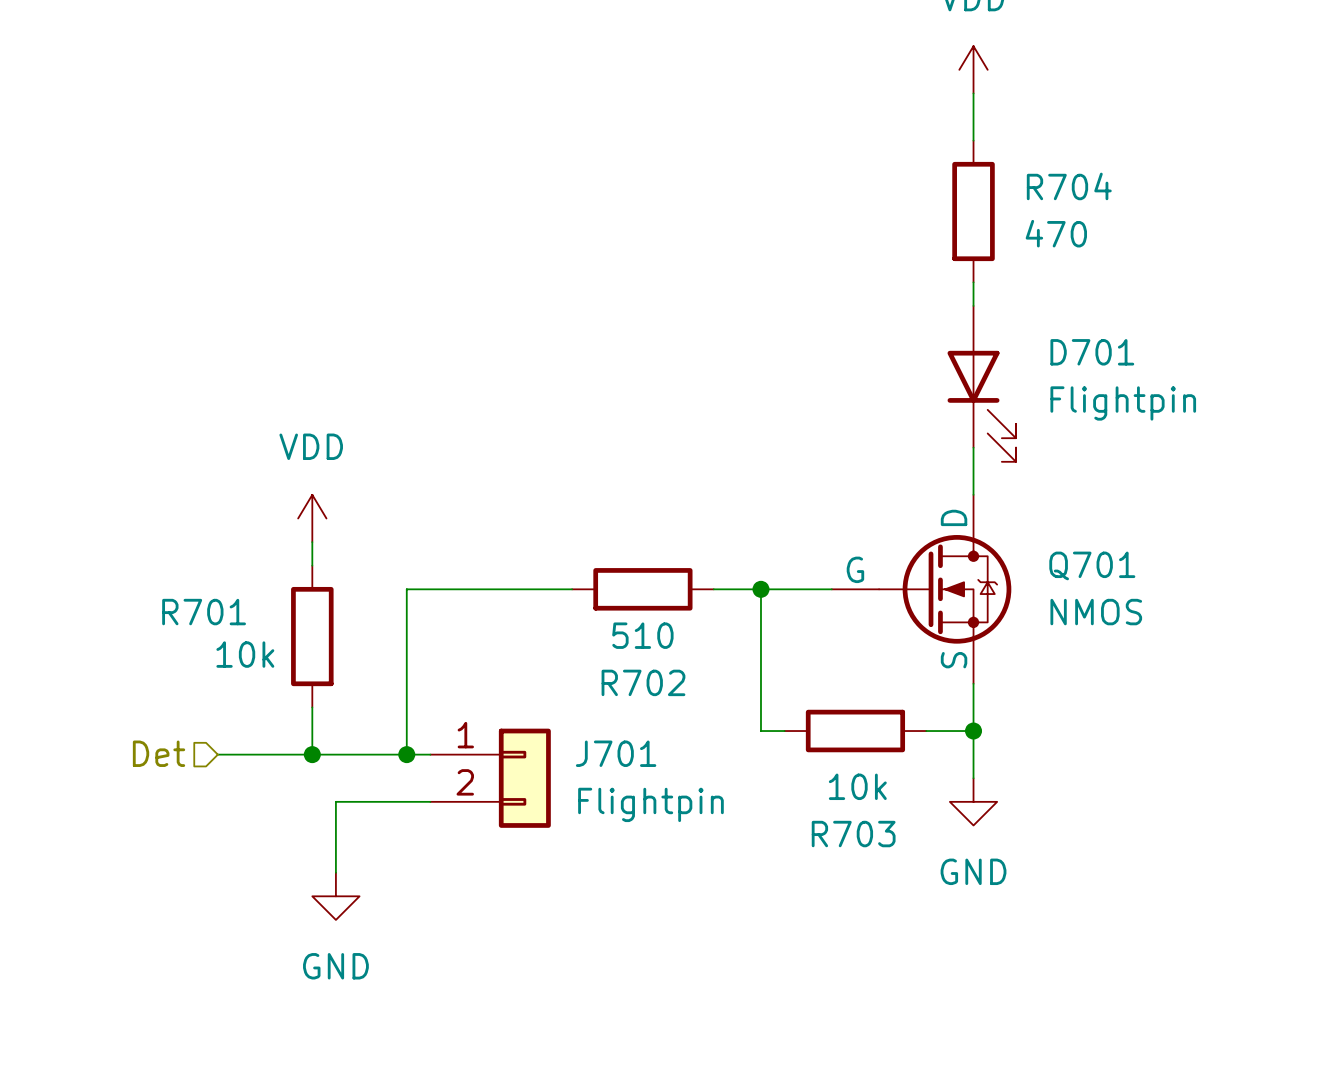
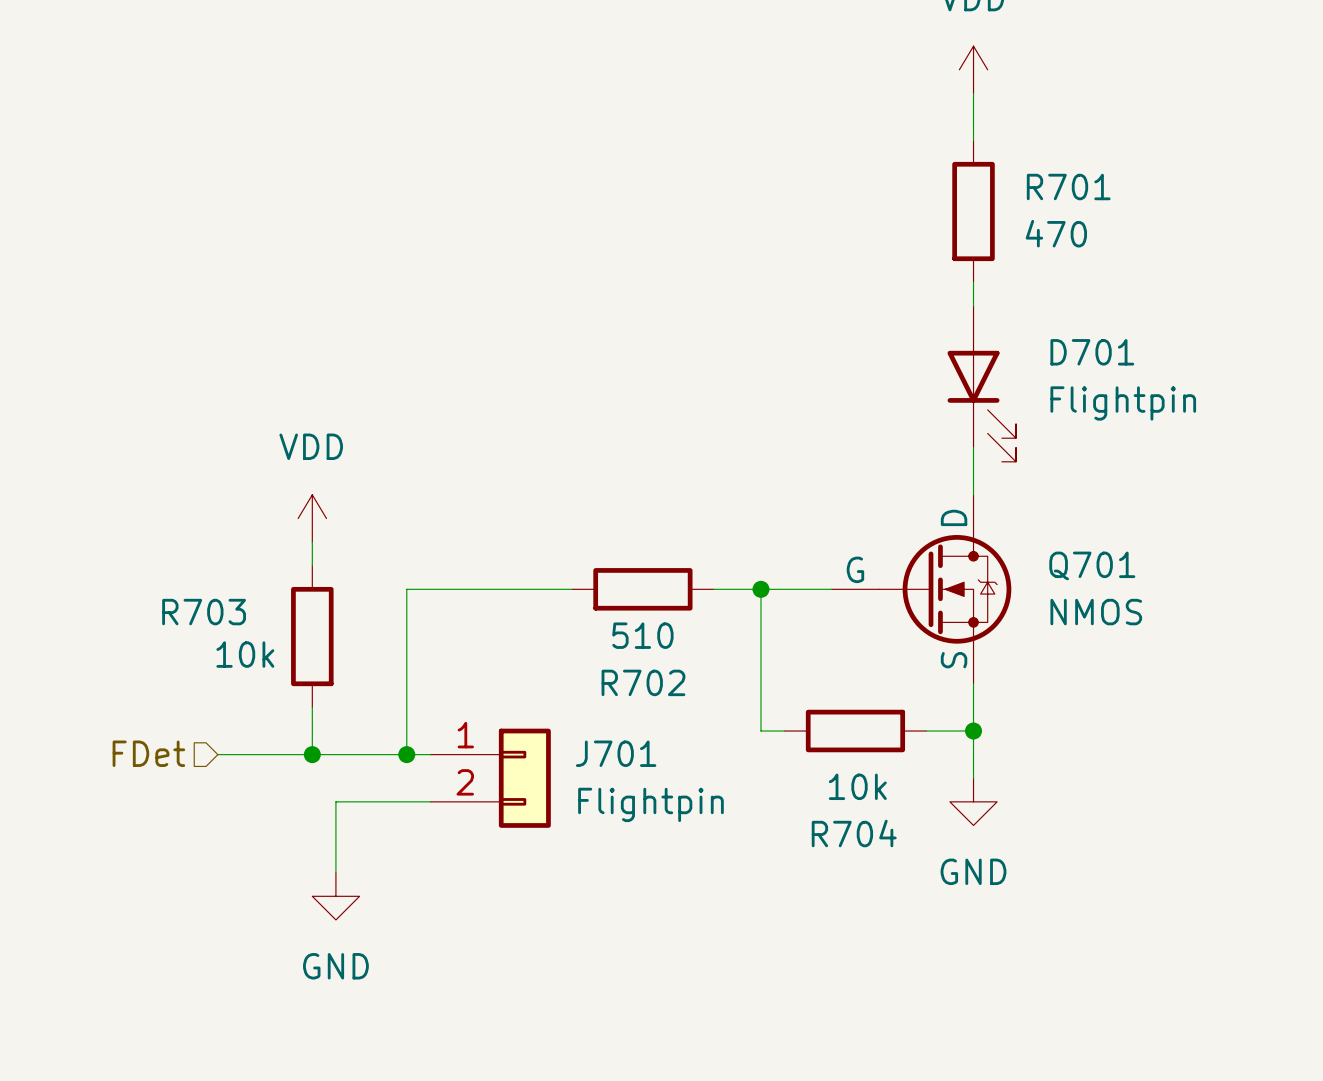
R704 name: R704 (1069, 186) -> R701 (1068, 187)
R701 name: R701 (204, 612) -> R703 (204, 612)
hierarchical label: Det (159, 753) -> FDet (148, 753)
R703 name: R703 (853, 834) -> R704 (854, 833)

